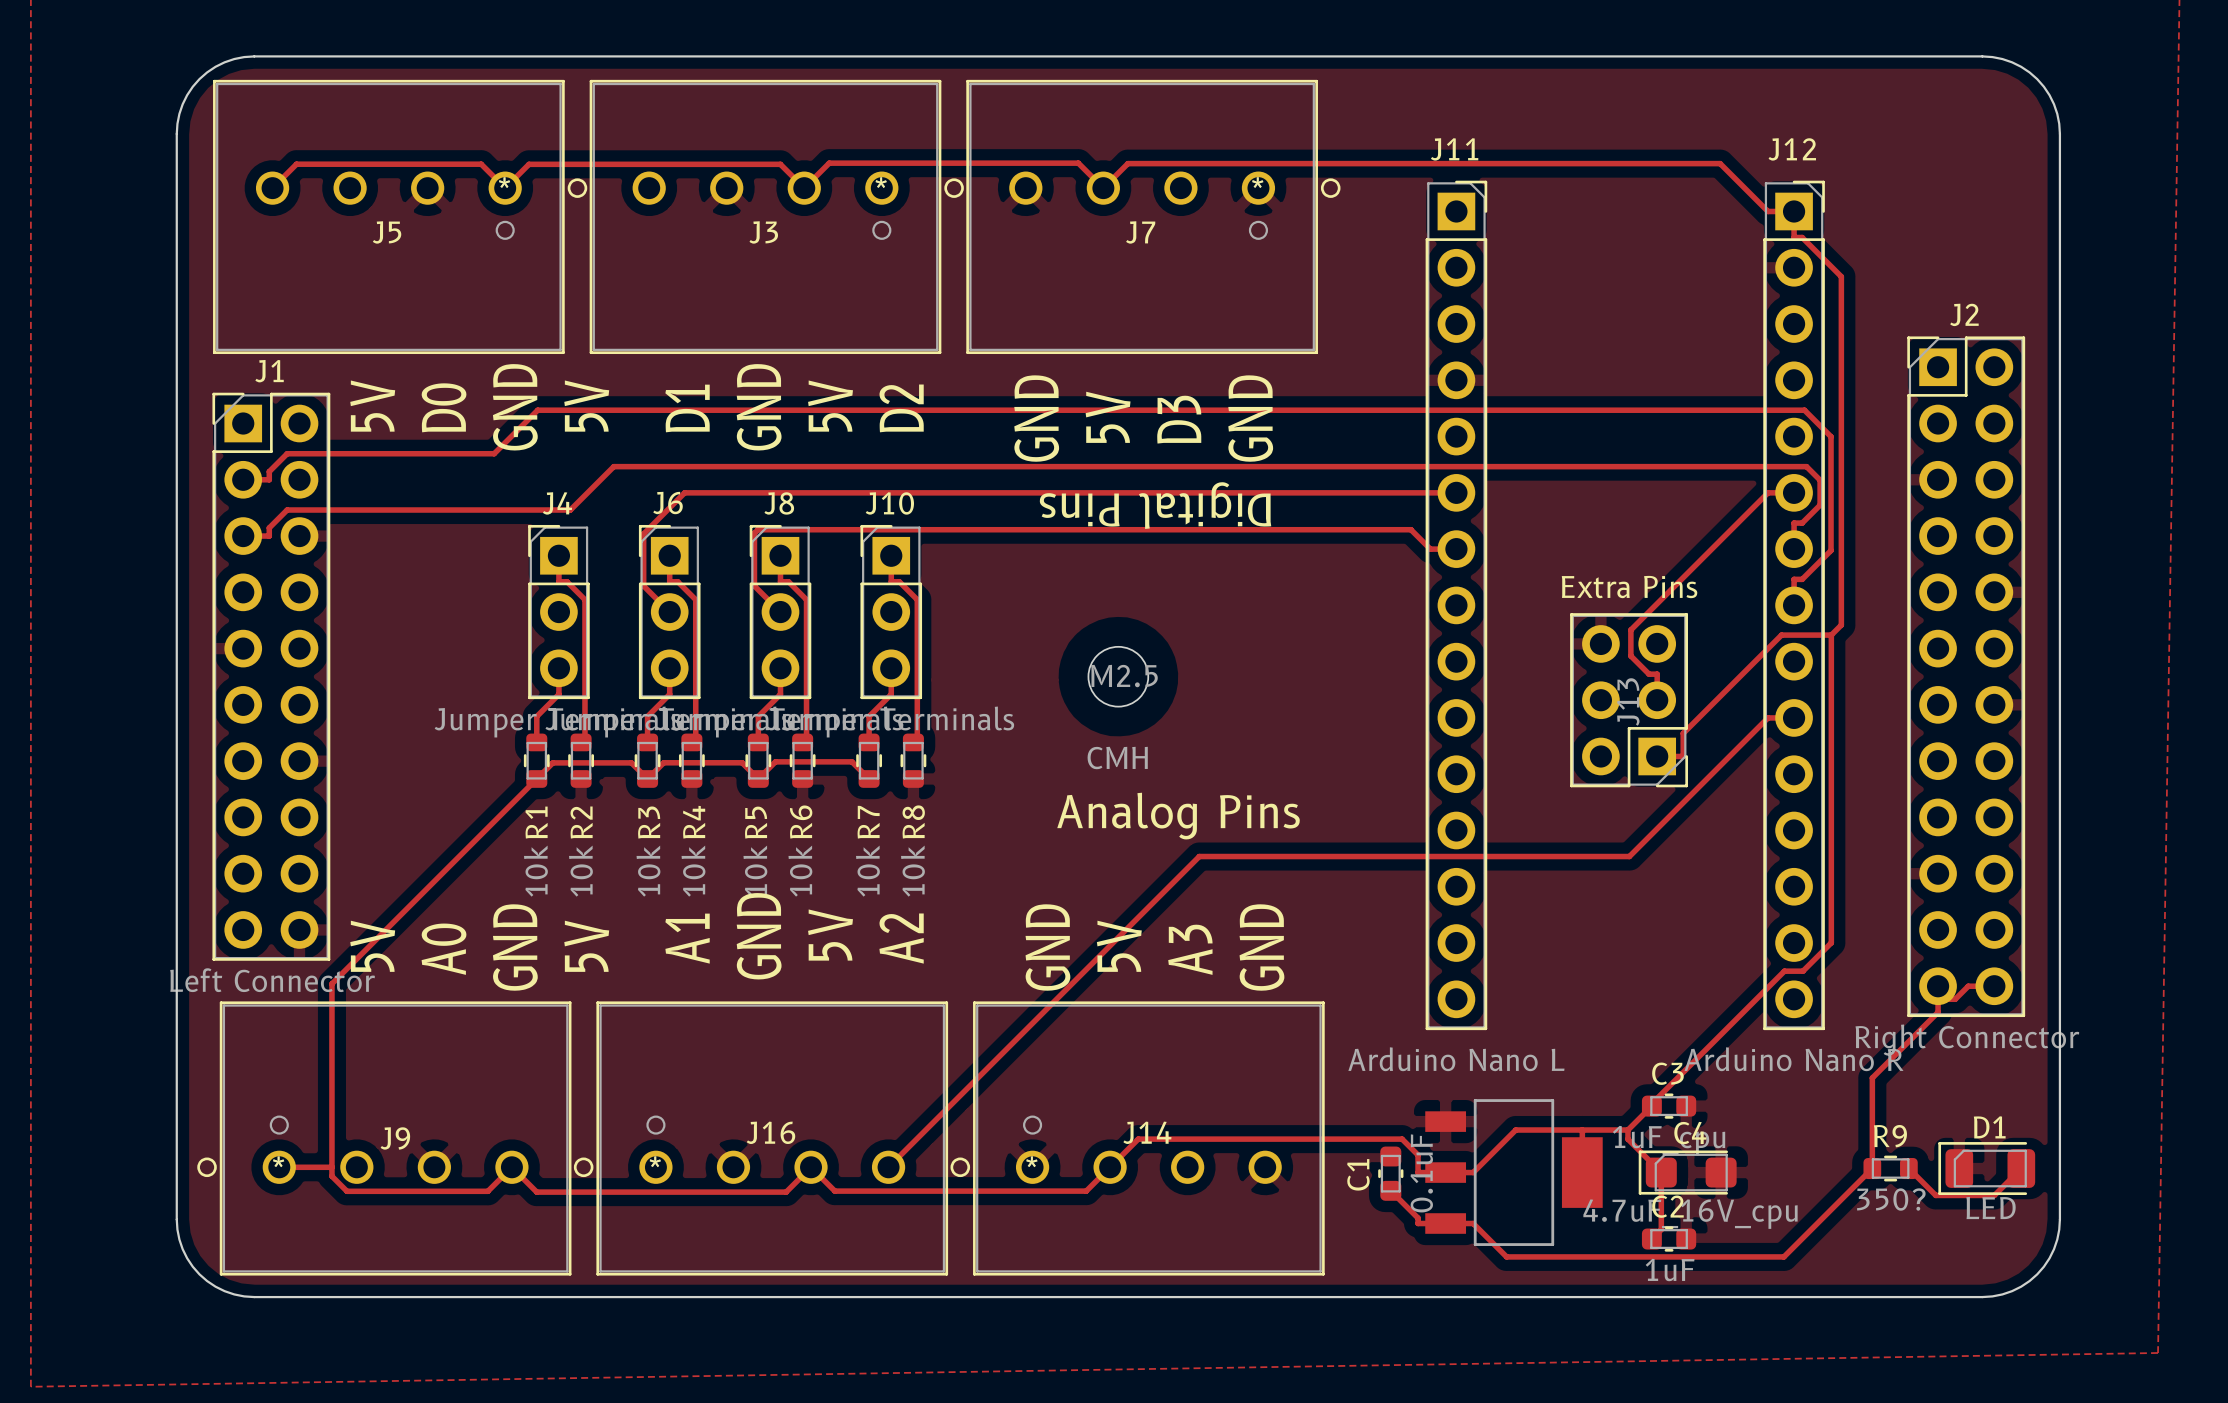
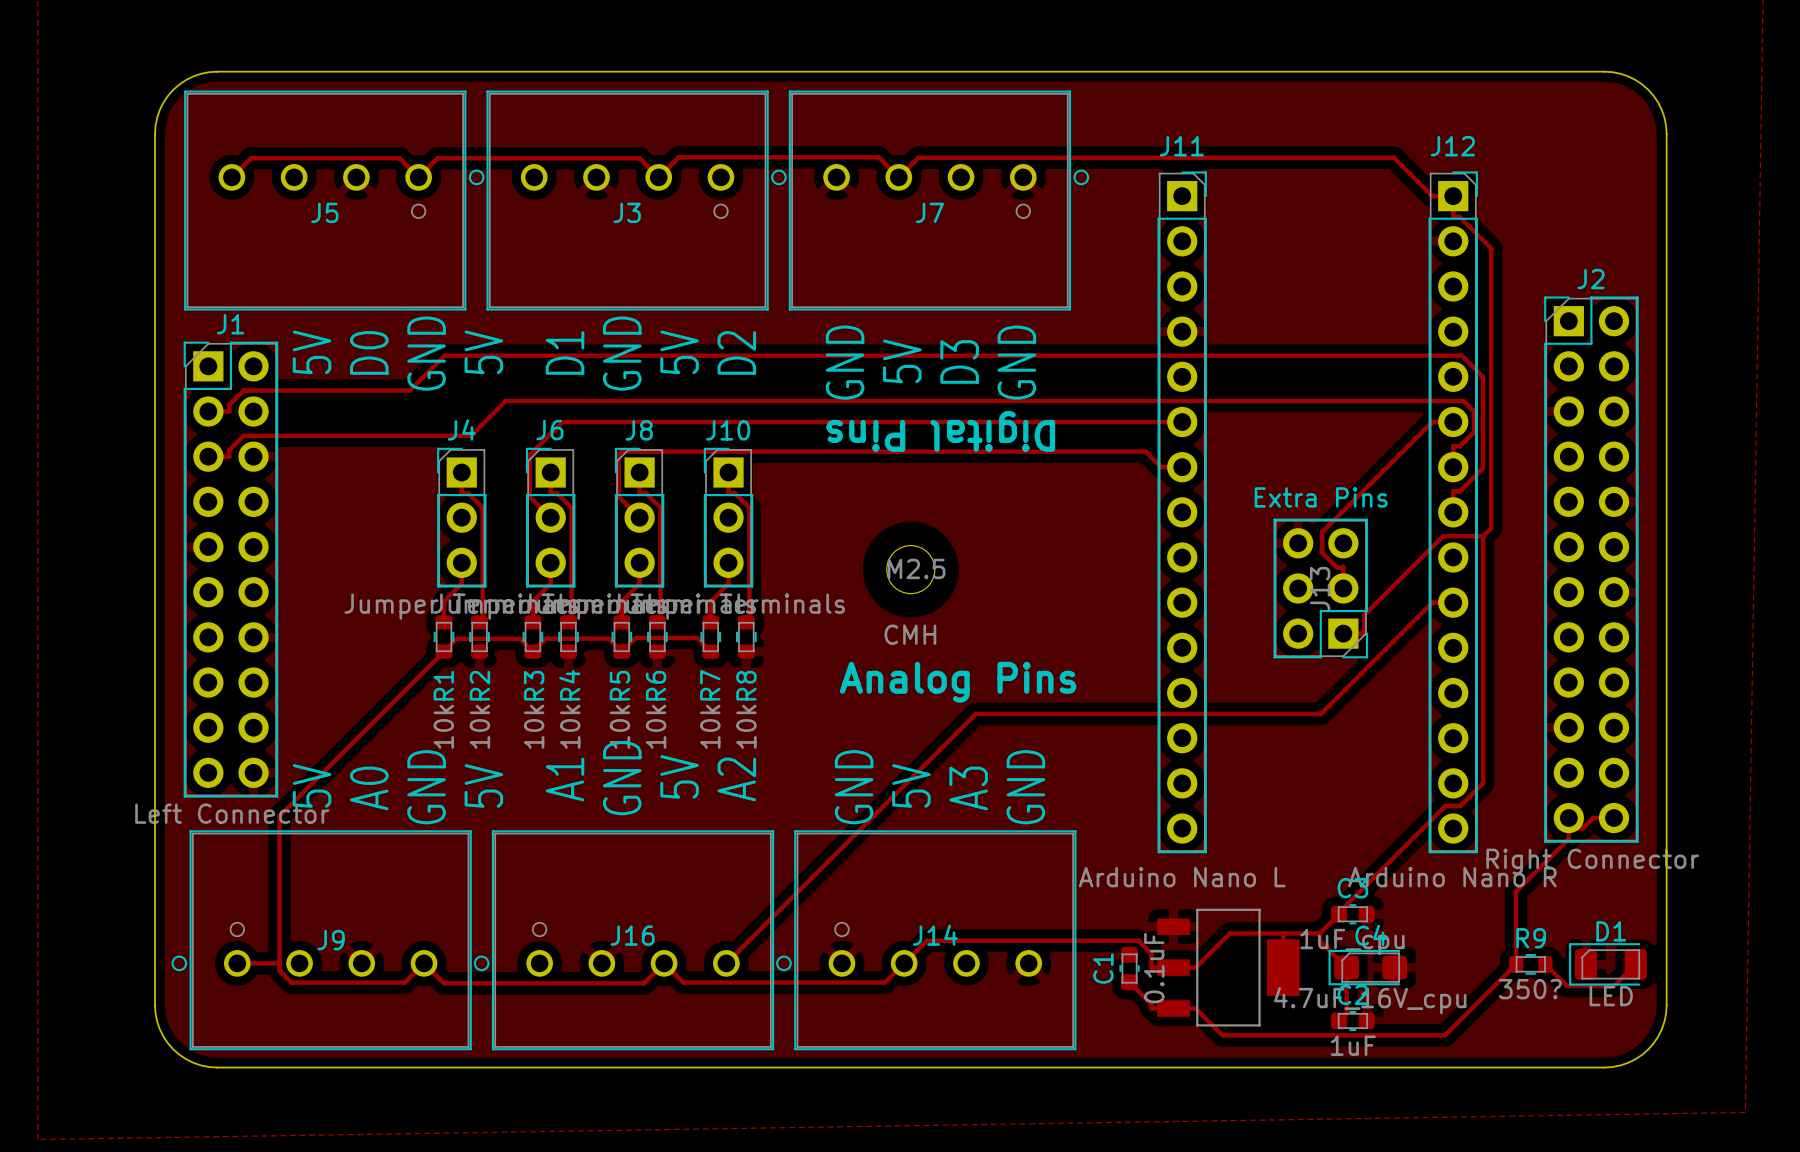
J5 footprint: [213, 79, 588, 355] -> [184, 90, 485, 311]
J3 footprint: [589, 79, 964, 355] -> [486, 90, 787, 311]
J7 footprint: [966, 79, 1341, 355] -> [788, 90, 1090, 311]
J9 footprint: [197, 1001, 572, 1276] -> [171, 830, 472, 1051]
J16 footprint: [573, 1001, 949, 1276] -> [473, 830, 775, 1051]
J14 footprint: [950, 1001, 1325, 1276] -> [776, 830, 1077, 1051]

